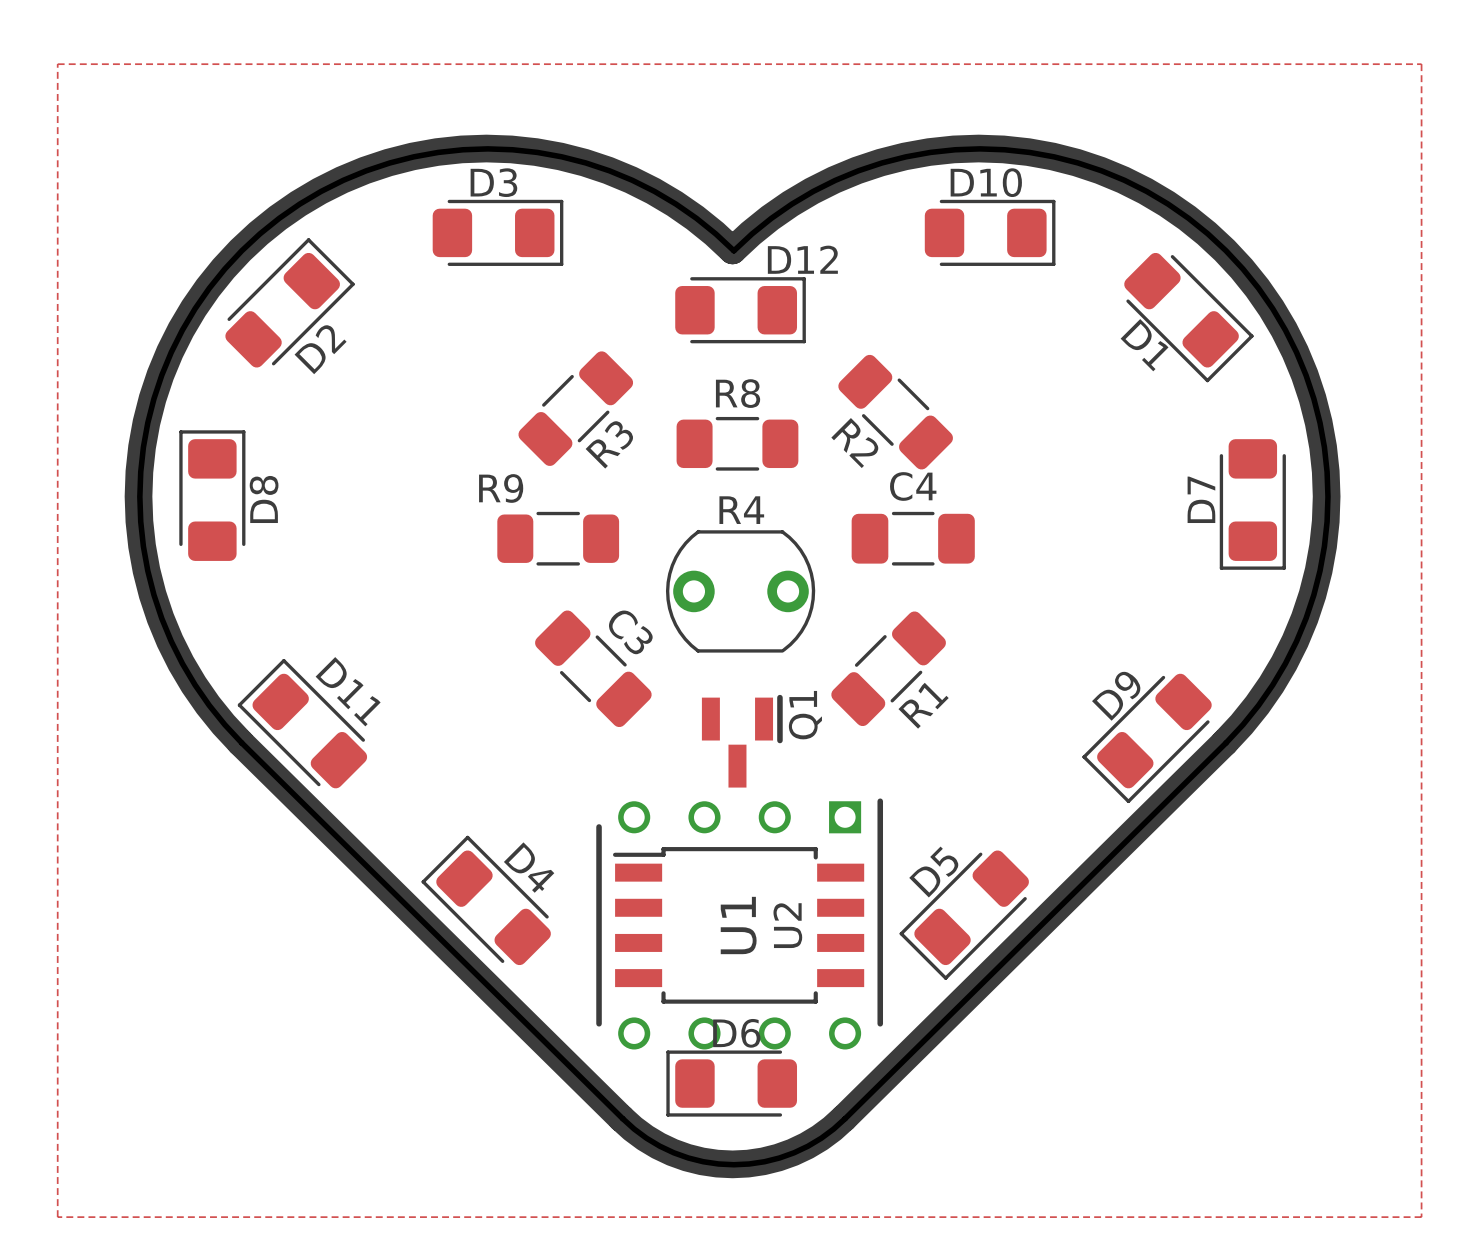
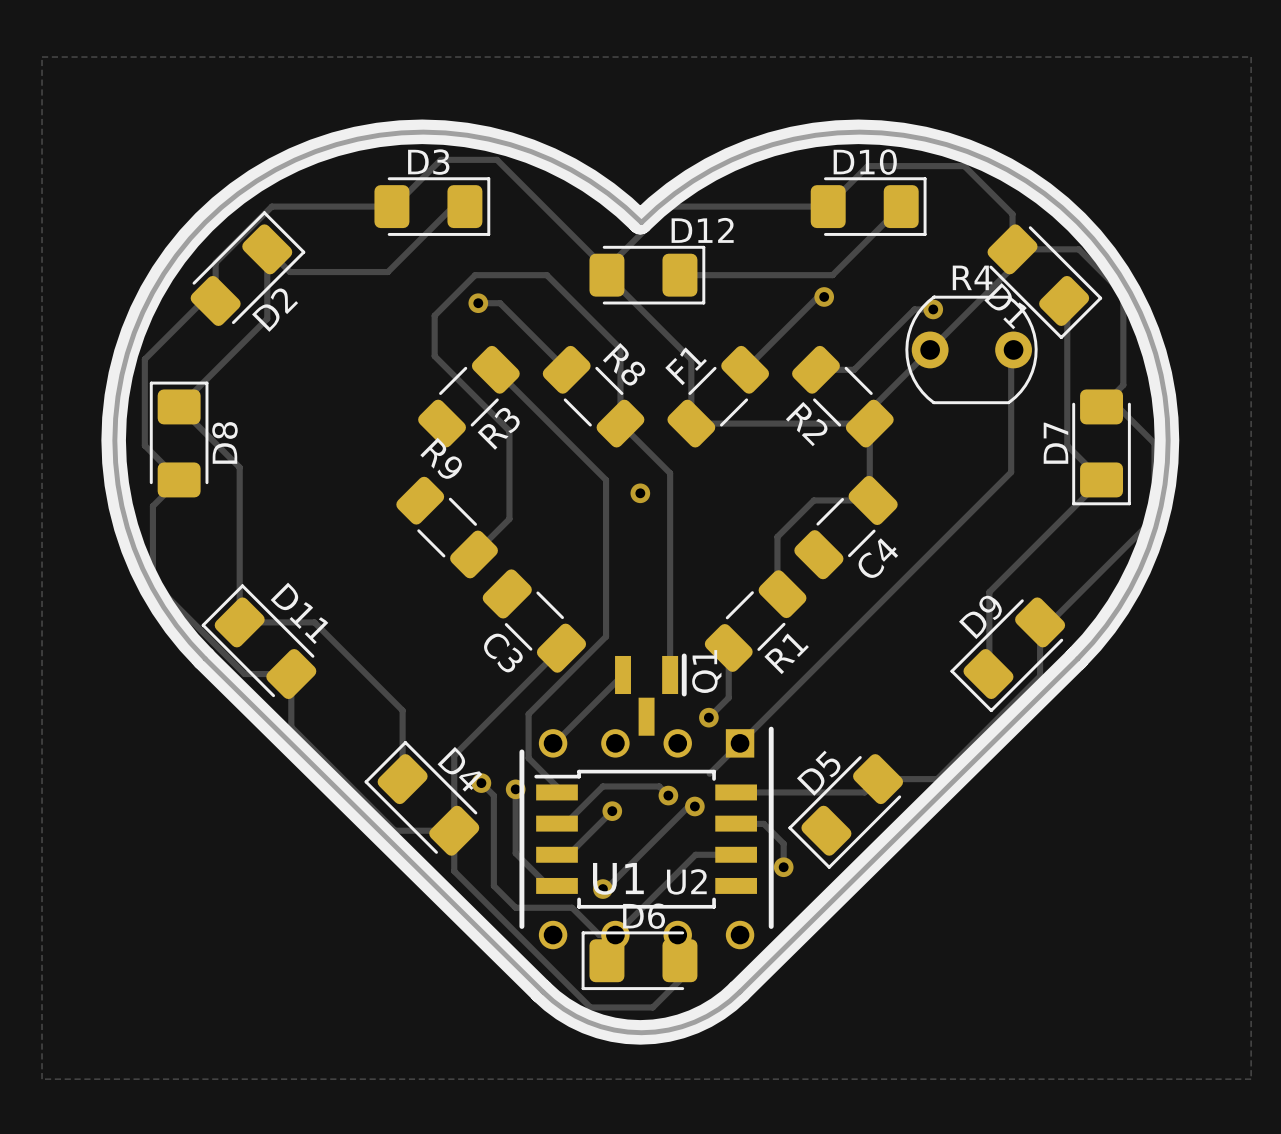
track: none -> (464, 206) (453, 206) (387, 272) (289, 272) (267, 249) (267, 318) (179, 406) (239, 467) (239, 622) (314, 622) (402, 710) (402, 779)
track: none -> (901, 206) (832, 275) (679, 275)
track: none -> (1012, 249) (1078, 249) (1123, 293) (1123, 385) (1101, 406) (1118, 406) (1154, 443) (1154, 518) (1050, 622) (1040, 622) (1040, 676) (937, 779) (878, 779) (864, 792) (736, 792)
track: none -> (606, 269) (496, 159) (440, 159) (394, 206) (271, 206) (215, 262) (215, 300) (203, 300) (144, 359) (144, 445) (179, 479) (152, 506) (152, 582) (244, 674) (291, 674) (291, 727) (395, 830) (454, 830)
track: none -> (824, 296) (817, 296) (745, 369)
via: none -> (824, 296)
track: none -> (1064, 300) (1067, 304) (1067, 445) (1101, 479) (989, 592) (989, 674)
track: none -> (478, 303) (500, 303) (566, 369)
via: none -> (478, 303)
track: none -> (933, 309) (914, 309) (854, 369) (816, 369)
via: none -> (933, 309)
track: none -> (1013, 349) (1011, 352) (1011, 472) (709, 773)
R3 position: (575, 408) -> (468, 396)
R2 position: (895, 412) -> (842, 396)
track: none -> (495, 369) (606, 480) (606, 636) (528, 714) (528, 758) (557, 786) (557, 792)
R8 rotation: 0° (737, 443) -> 45° clockwise (593, 396)
F1: none -> (718, 396)
track: none -> (869, 423) (691, 423) (691, 359) (606, 275) (606, 268) (668, 206) (828, 206) (867, 166) (964, 166) (1012, 214) (1012, 267) (869, 410) (869, 497) (873, 500) (813, 500) (777, 536) (777, 589) (782, 594)
C4 name position: C4 (913, 486) -> C4 (878, 558)
R9 rotation: 0° (558, 538) -> 45° clockwise (447, 527)
C4 rotation: 0° (913, 538) -> 45° counterclockwise (846, 527)
C4 position: (913, 538) -> (846, 527)
via: none -> (640, 493)
R4 position: (740, 591) -> (971, 349)
track: none -> (474, 554) (509, 519) (509, 430) (434, 356) (434, 315) (475, 275) (546, 275) (620, 348) (620, 423) (670, 473) (670, 674)
C3 name position: C3 (630, 632) -> C3 (503, 653)
C3 position: (593, 668) -> (534, 621)
R1 position: (888, 668) -> (755, 621)
track: none -> (561, 648) (454, 755) (454, 871) (590, 1007) (652, 1007) (679, 980)
track: none -> (728, 647) (728, 697) (708, 717)
Q1 position: (742, 741) -> (650, 694)
track: none -> (623, 674) (553, 743)
via: none -> (708, 717)
track: none -> (481, 783) (493, 795) (493, 885) (515, 907) (572, 907) (599, 935) (615, 935) (695, 854) (736, 854)
via: none -> (481, 783)
track: none -> (515, 789) (515, 853) (548, 885) (557, 885)
via: none -> (515, 789)
track: none -> (668, 795) (659, 786) (602, 786) (565, 823) (557, 823)
via: none -> (668, 795)
track: none -> (694, 806) (688, 806) (606, 889) (602, 889)
via: none -> (694, 806)
track: none -> (612, 811) (568, 854) (557, 854)
via: none -> (612, 811)
U1 position: (739, 923) -> (646, 837)
U2 position: (738, 925) -> (645, 839)
U1 name rotation: 0° (738, 925) -> 90° clockwise (618, 878)
U2 name rotation: 0° (787, 925) -> 90° clockwise (686, 881)
track: none -> (730, 823) (763, 823) (783, 843) (783, 867)
via: none -> (783, 867)
via: none -> (602, 889)

